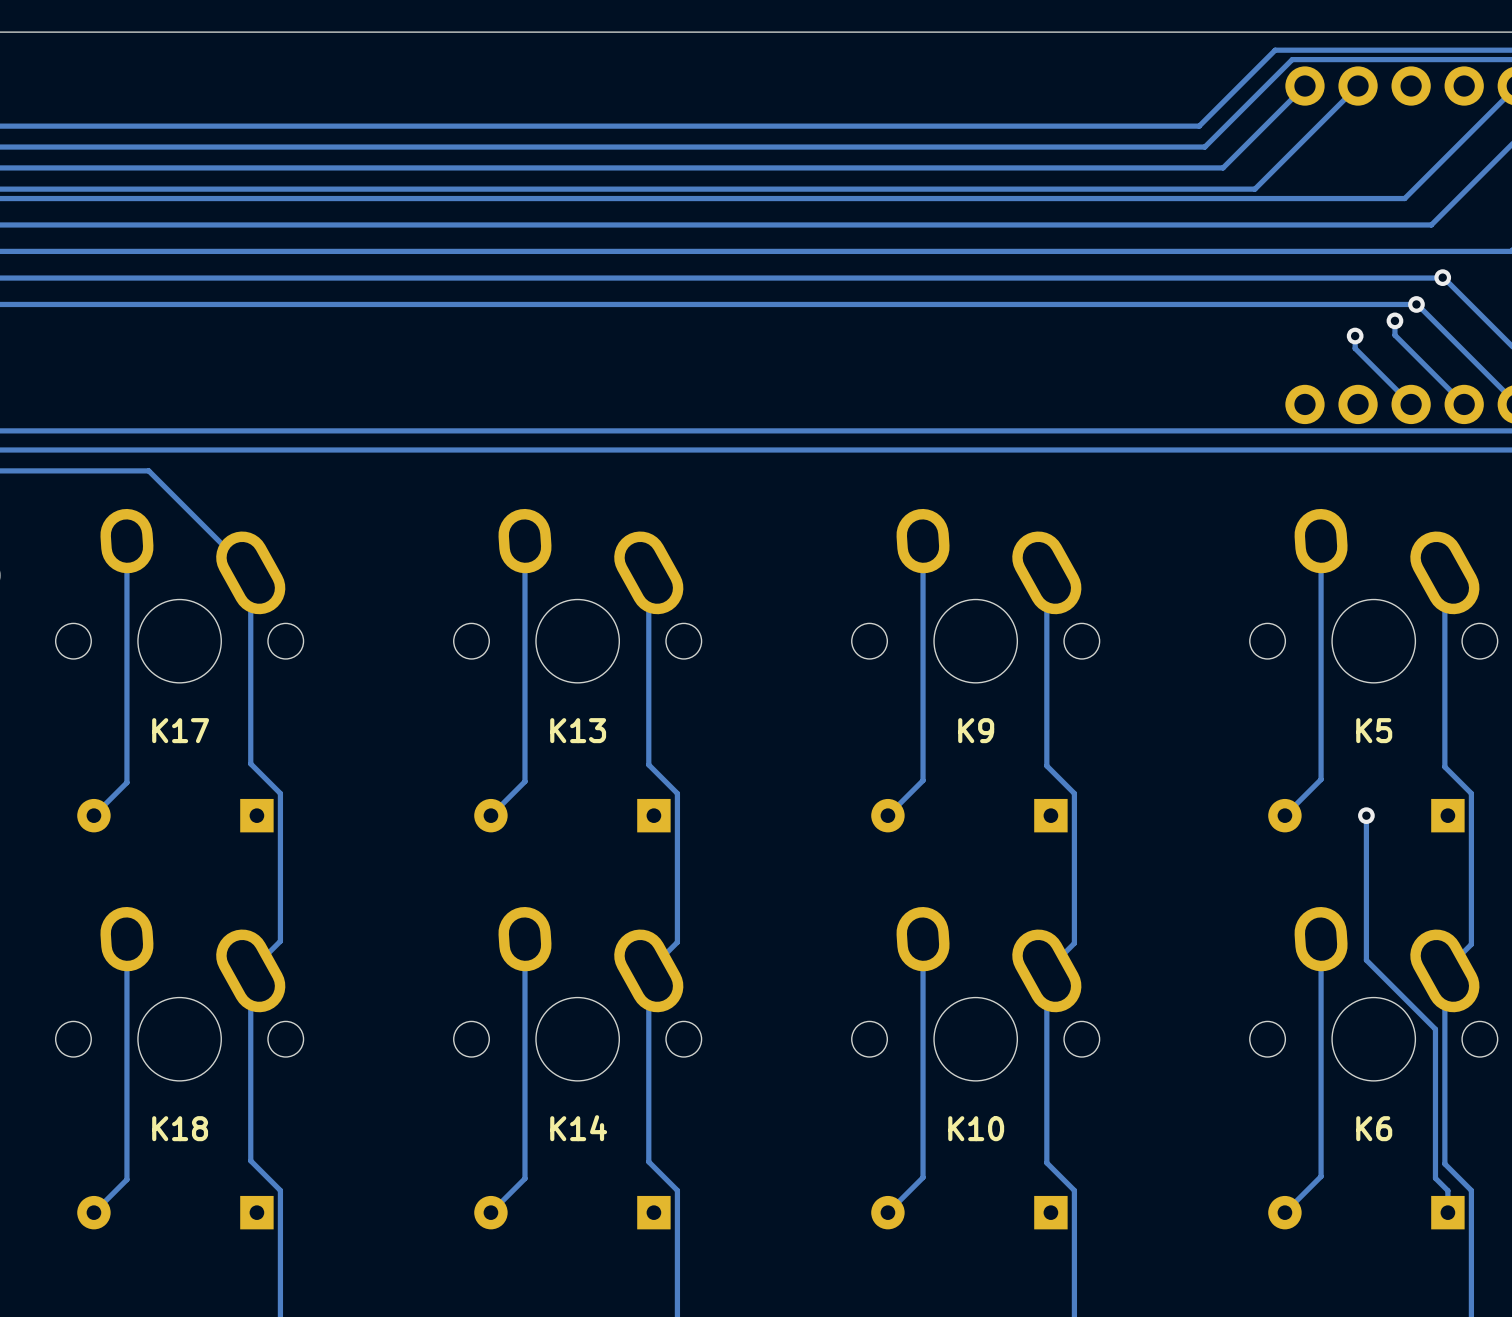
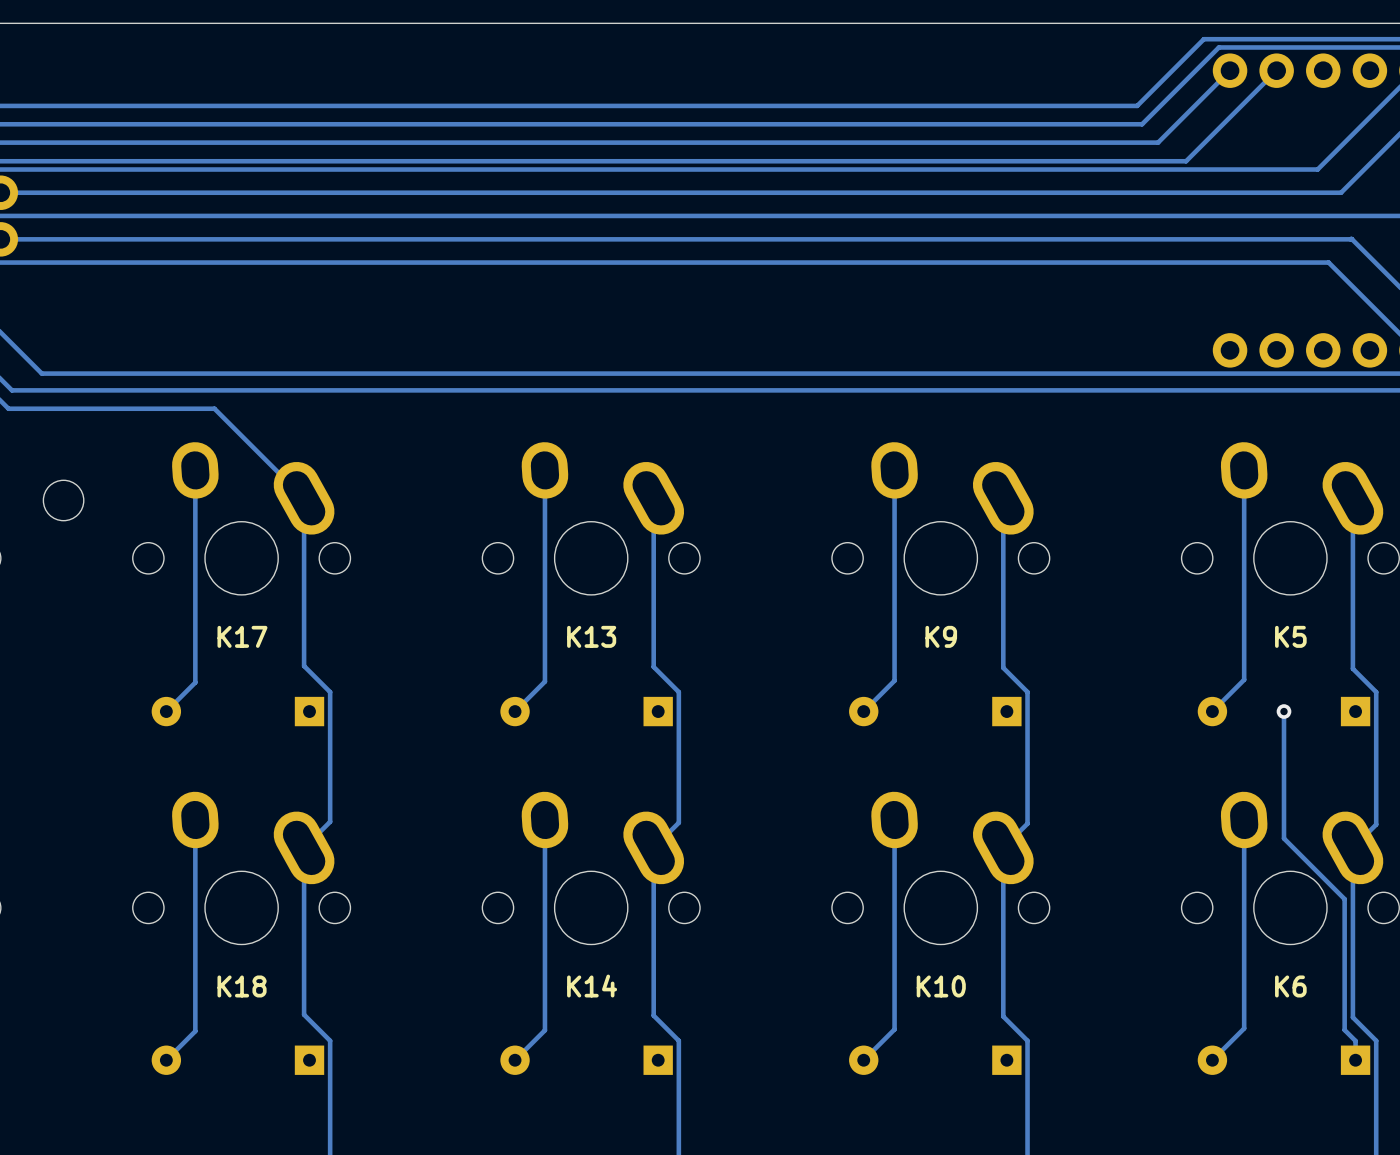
via: (1442, 277) -> none
via: (1416, 304) -> none
track: (1394, 320) (1394, 335) (1464, 404) -> none
via: (1394, 320) -> none
track: (1355, 336) (1355, 348) (1411, 404) -> none
via: (1355, 336) -> none

